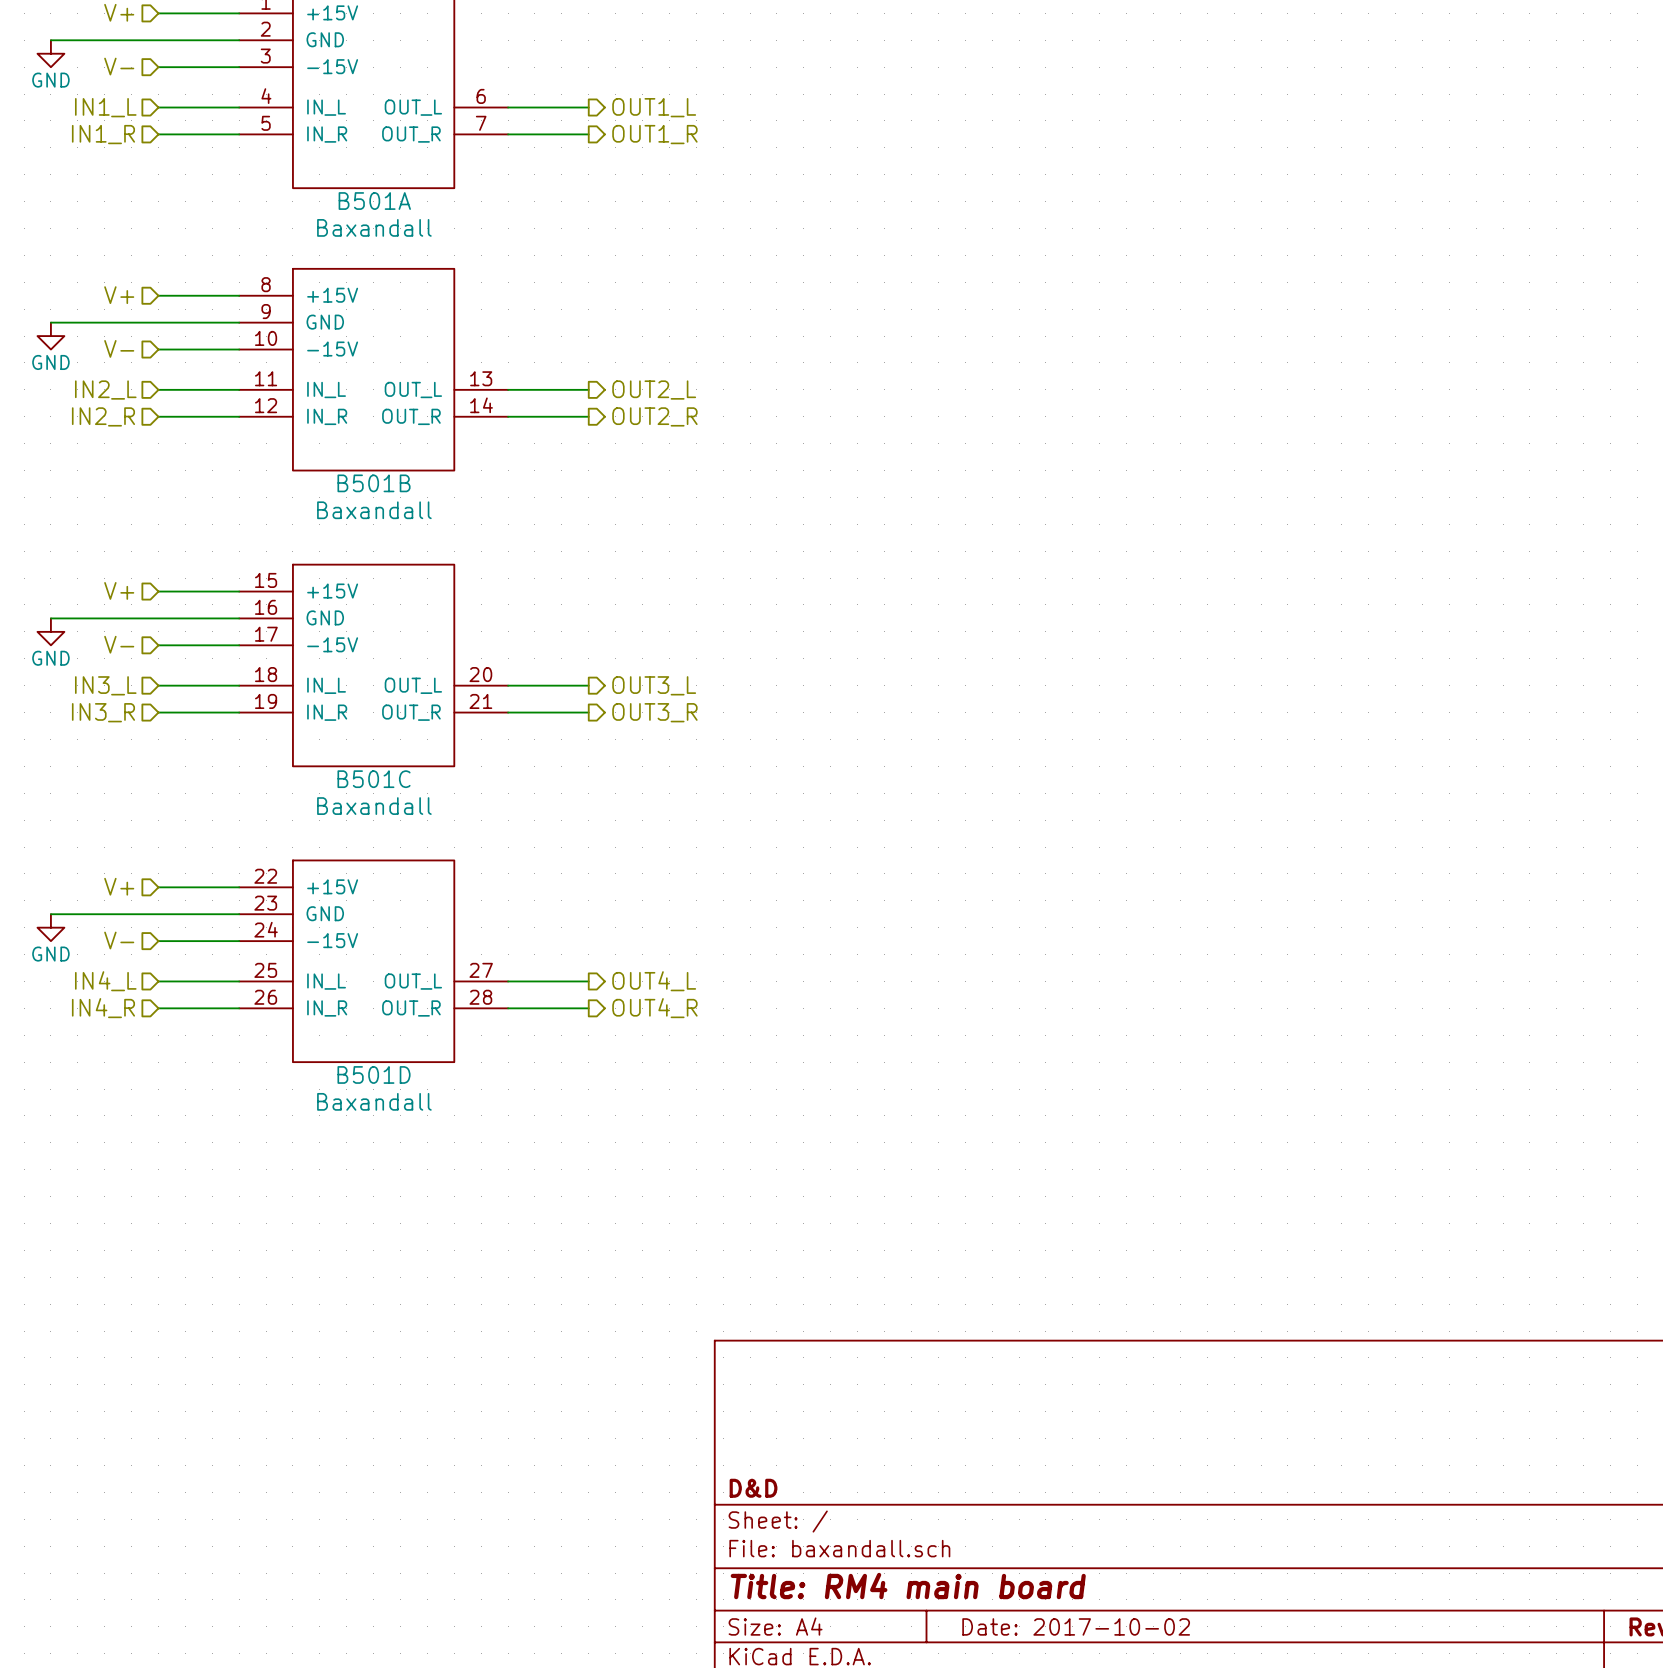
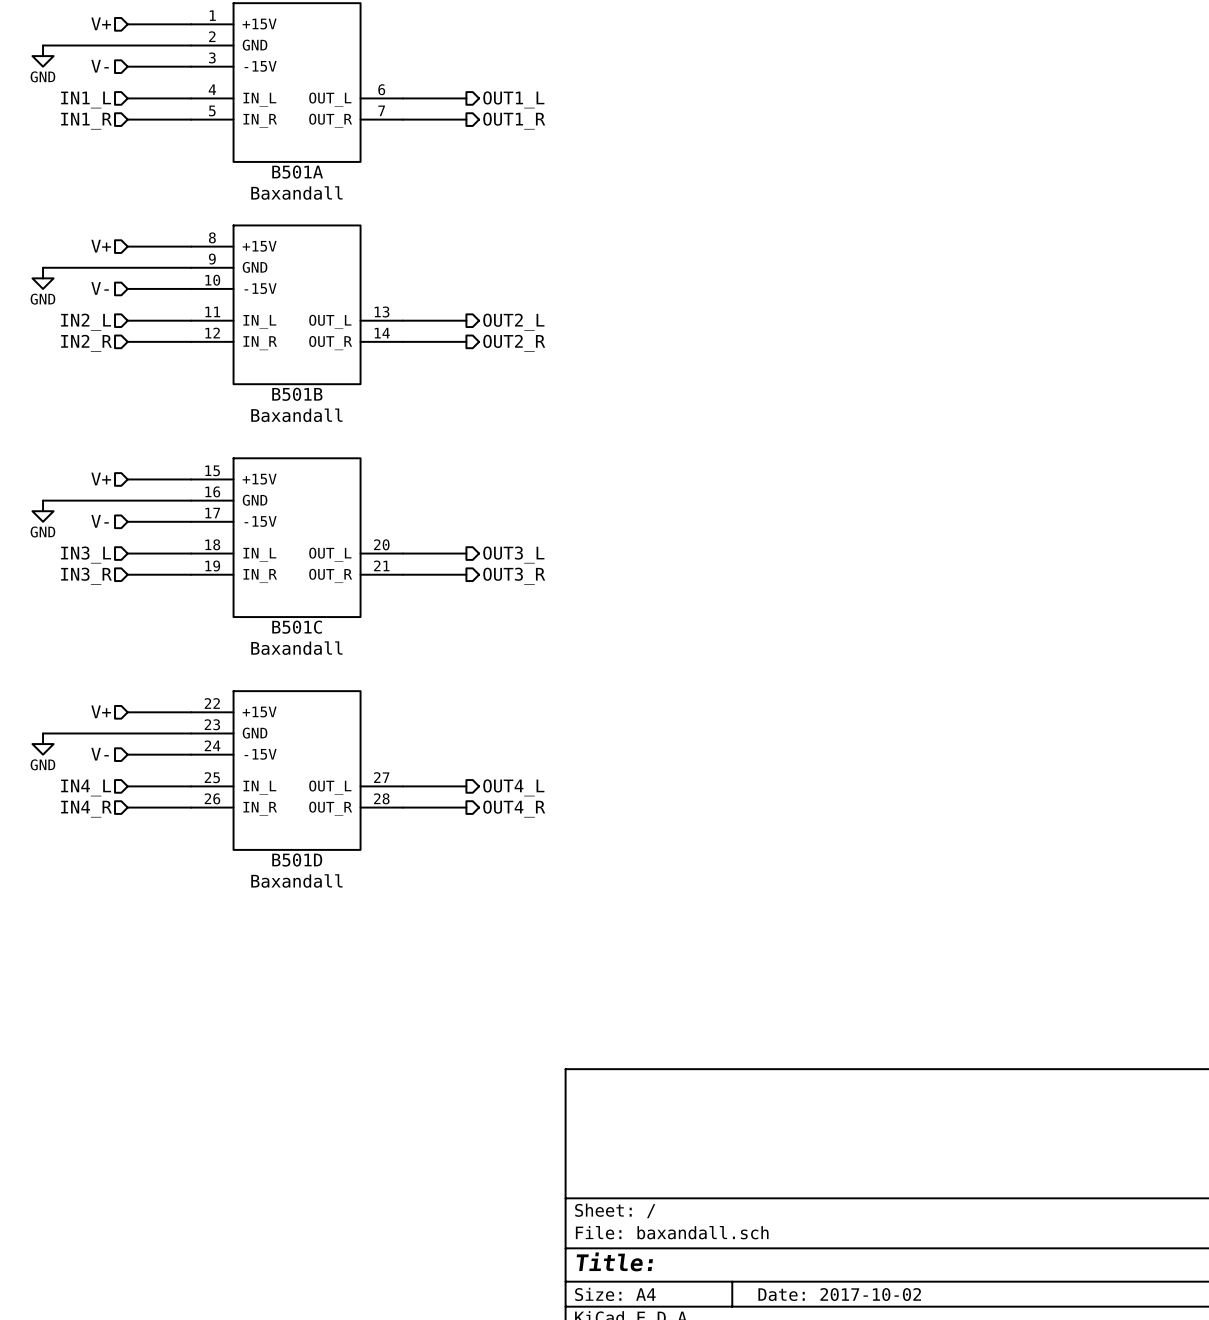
title block: D&D (753, 1488) -> none
title block: Title: RM4 main board (908, 1586) -> Title: (614, 1261)

